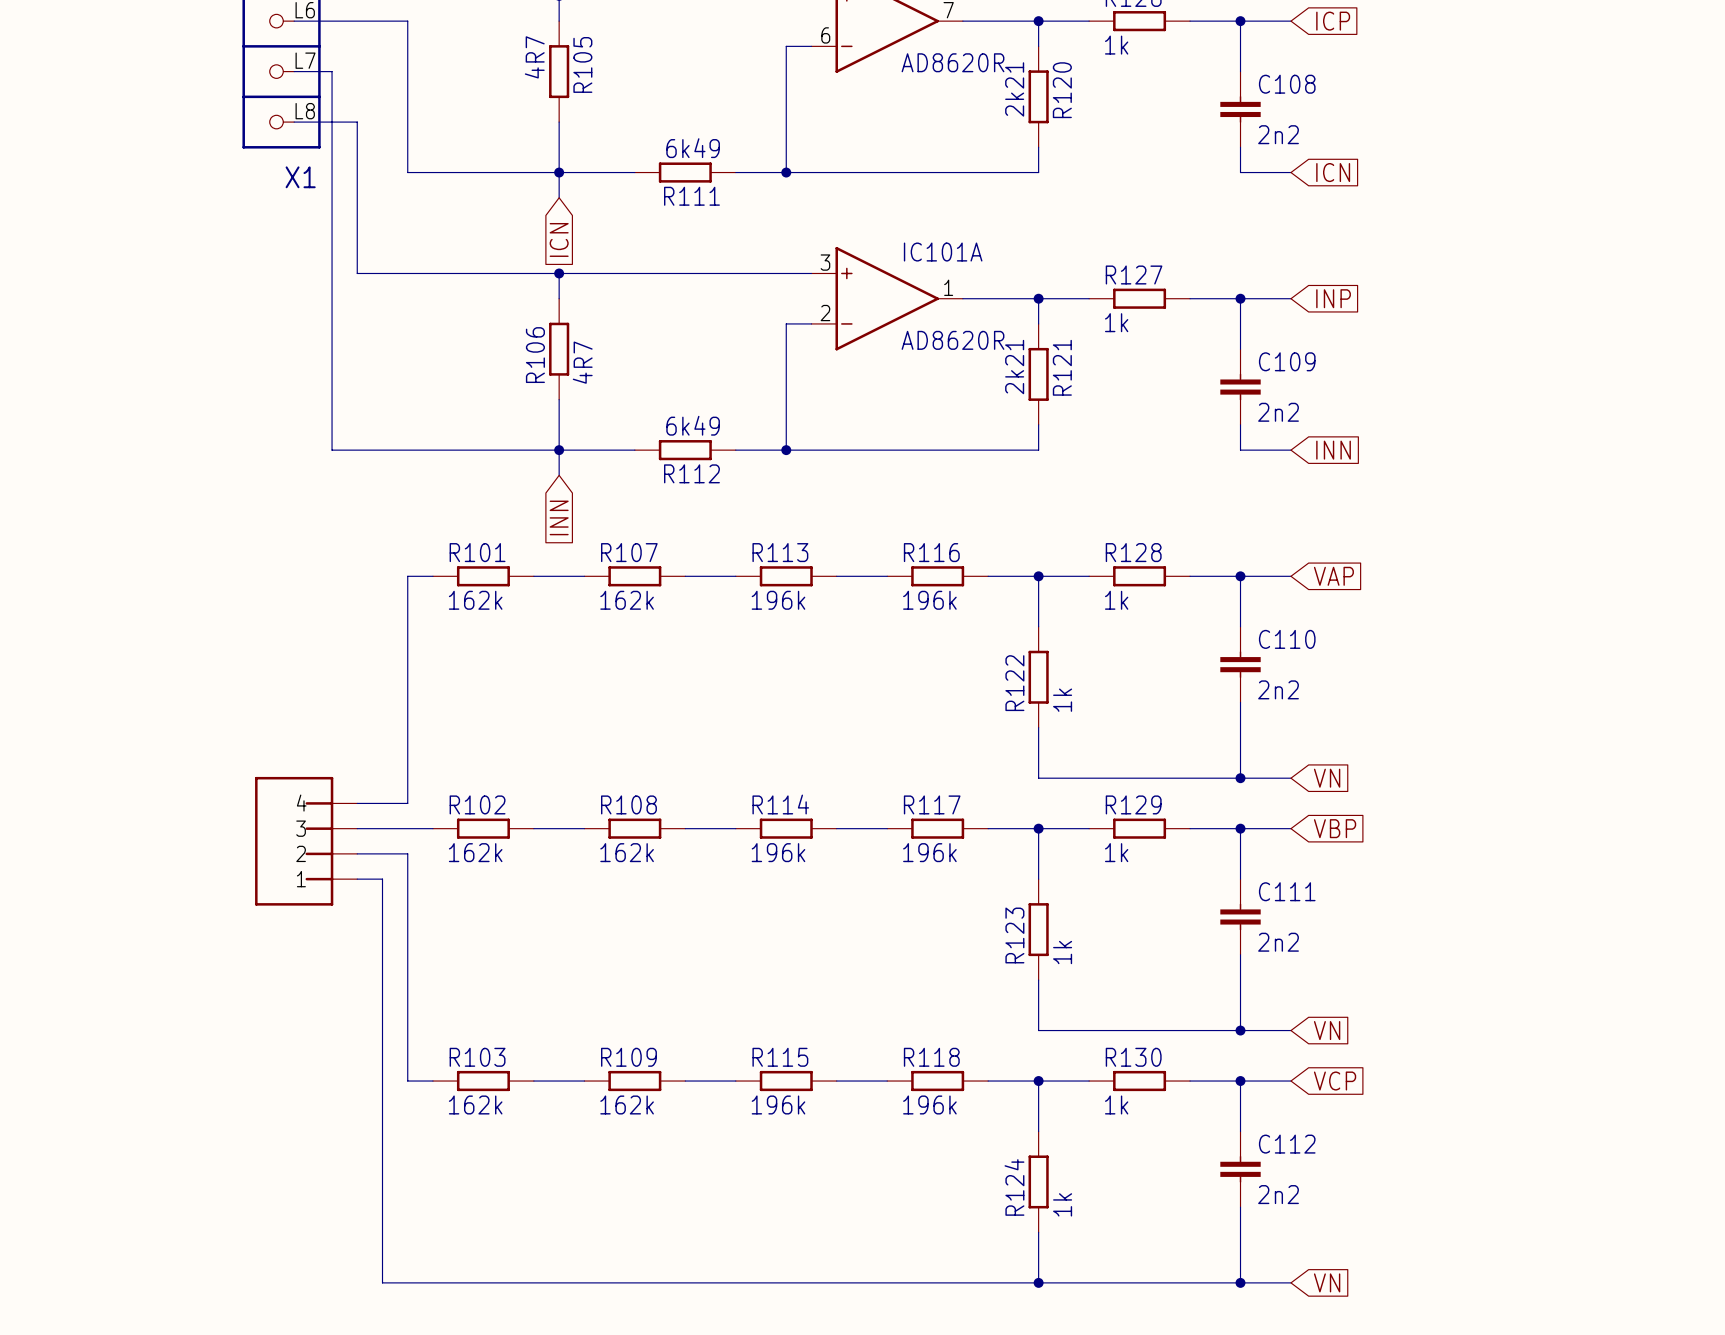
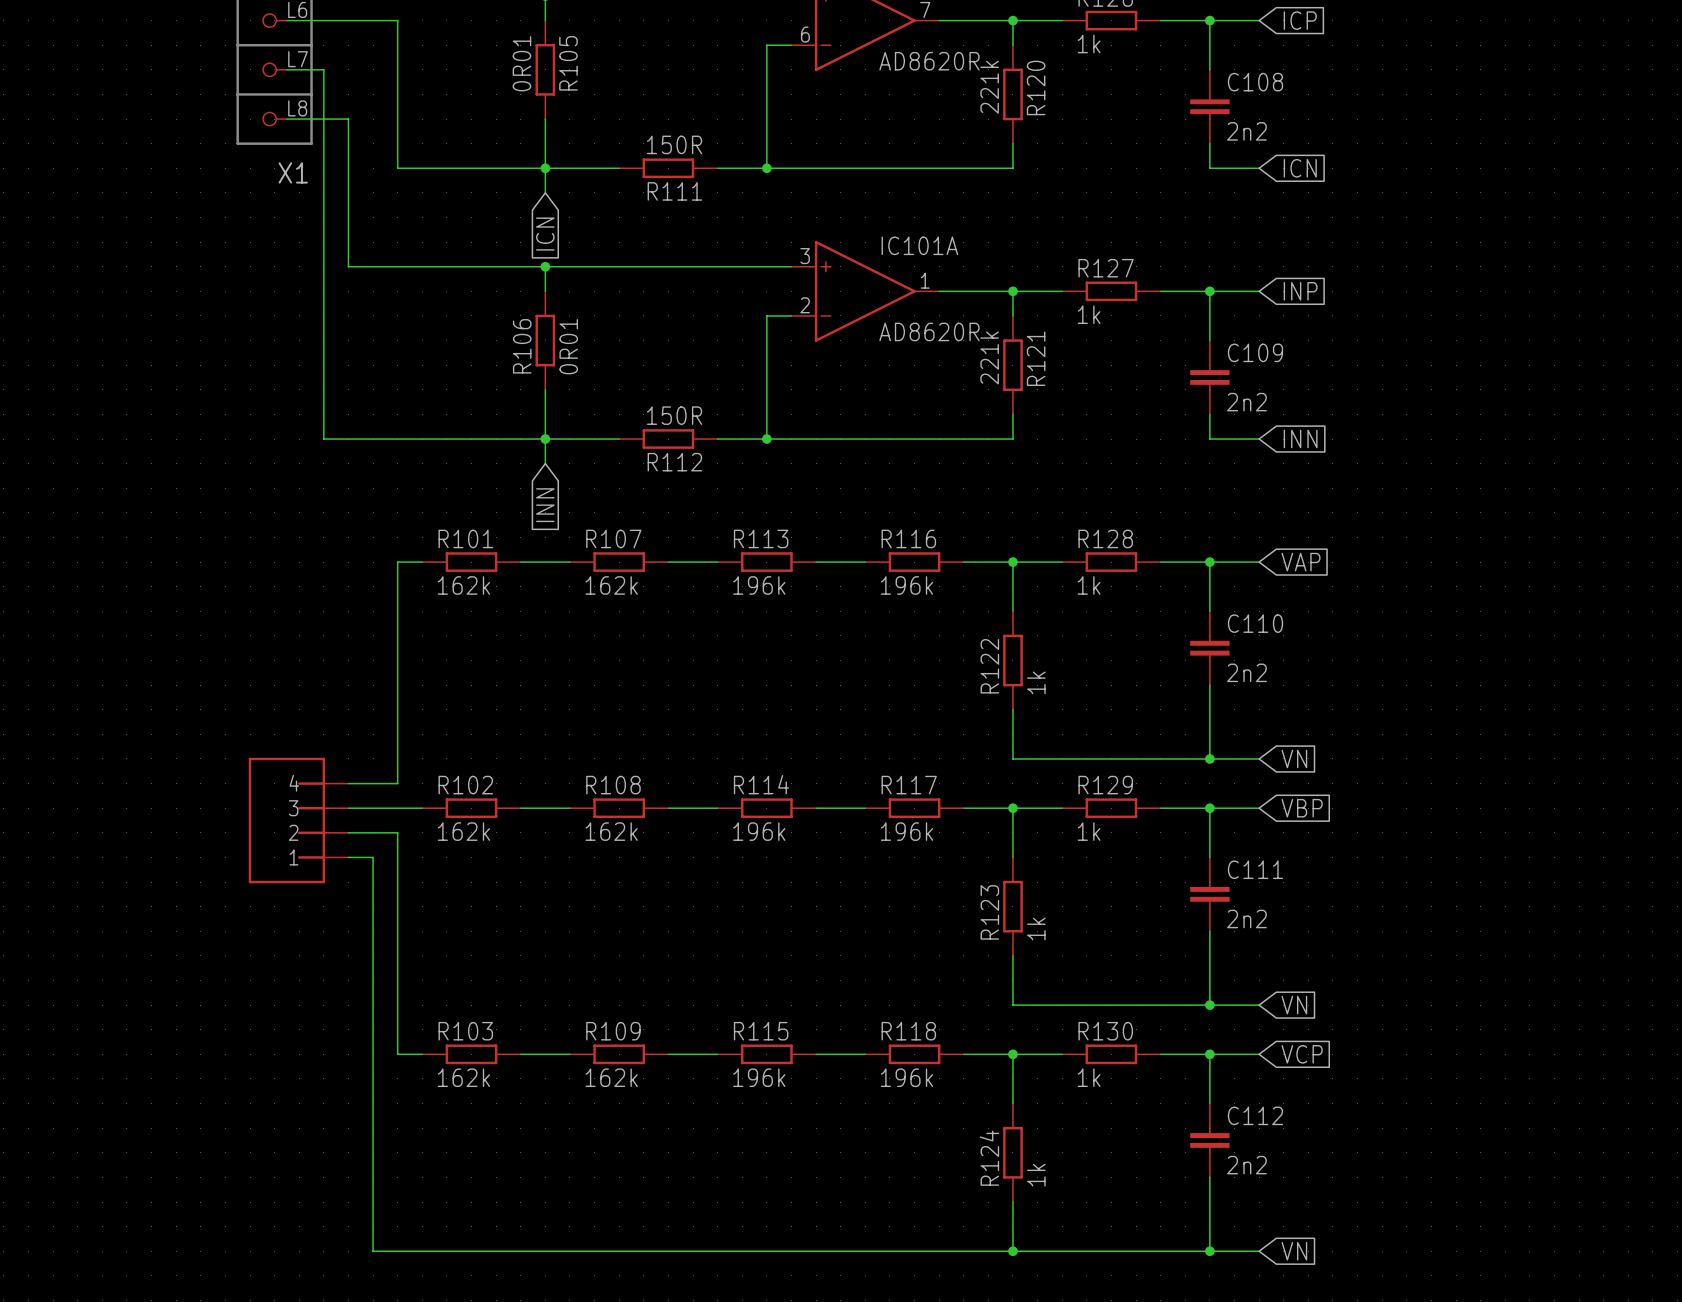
R105 value: 4R7 (534, 57) -> 0R01 (521, 63)
R120 value: 2k21 (1014, 89) -> 221k (989, 87)
R111 value: 6k49 (693, 148) -> 150R (674, 144)
R106 value: 4R7 (582, 362) -> 0R01 (568, 346)
R121 value: 2k21 (1014, 367) -> 221k (989, 357)
R112 value: 6k49 (693, 425) -> 150R (674, 415)

